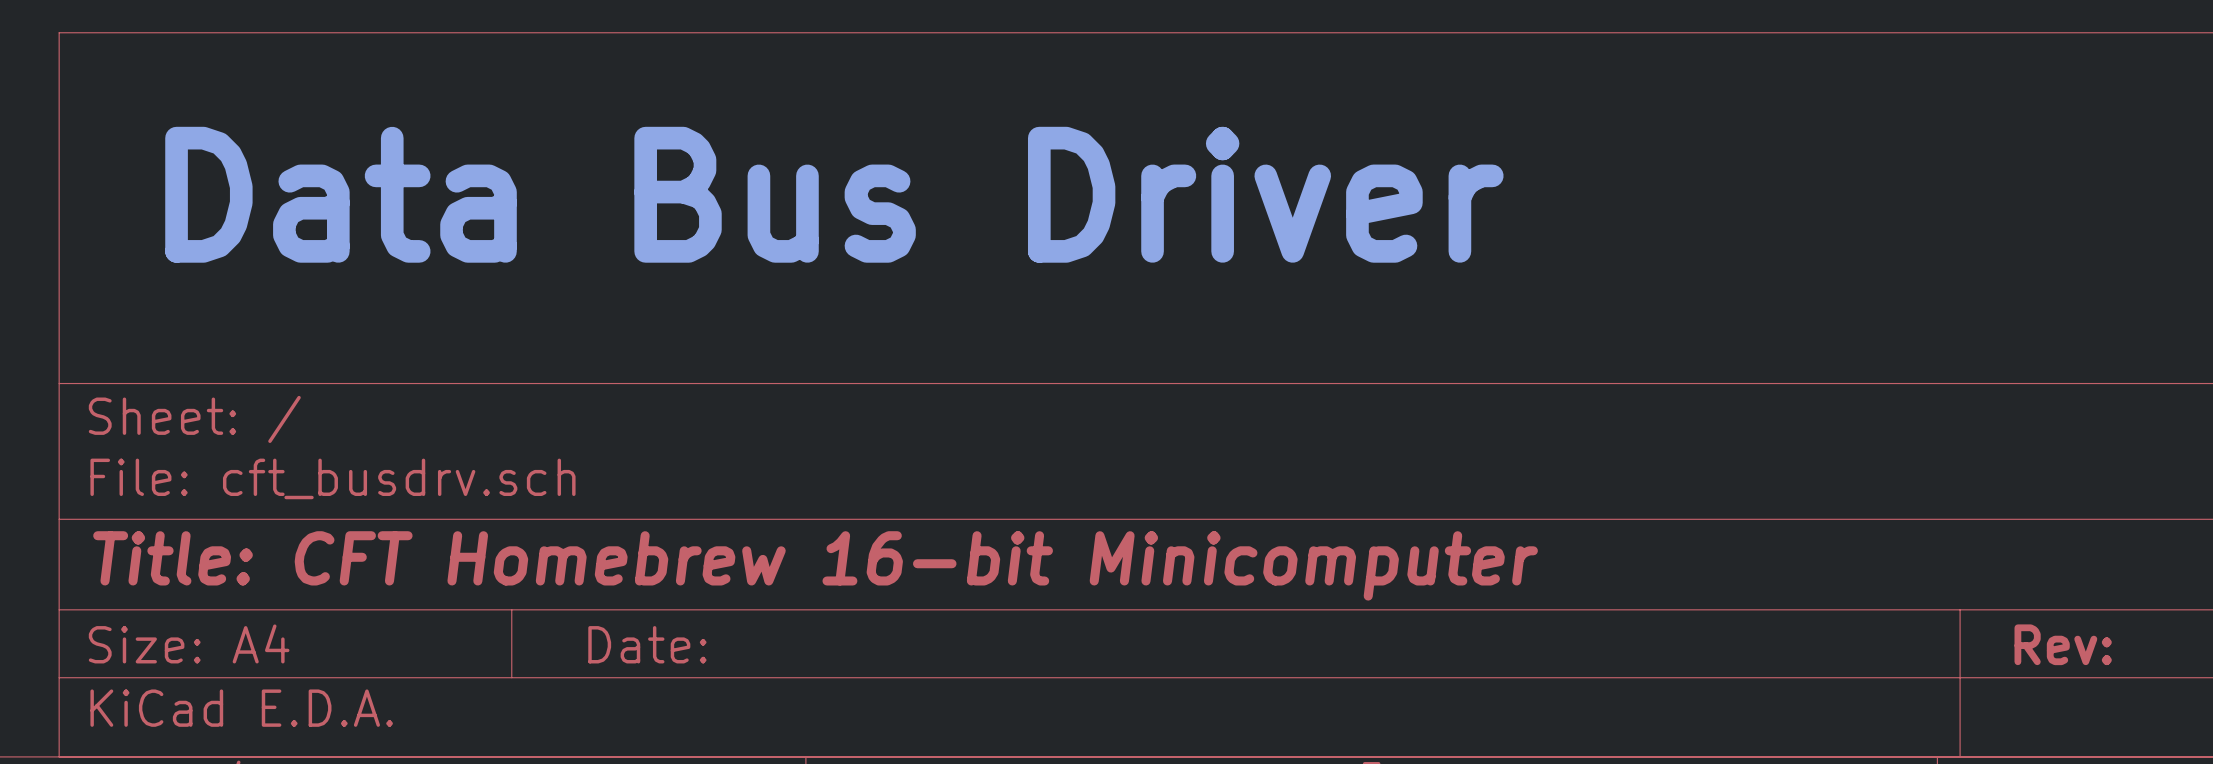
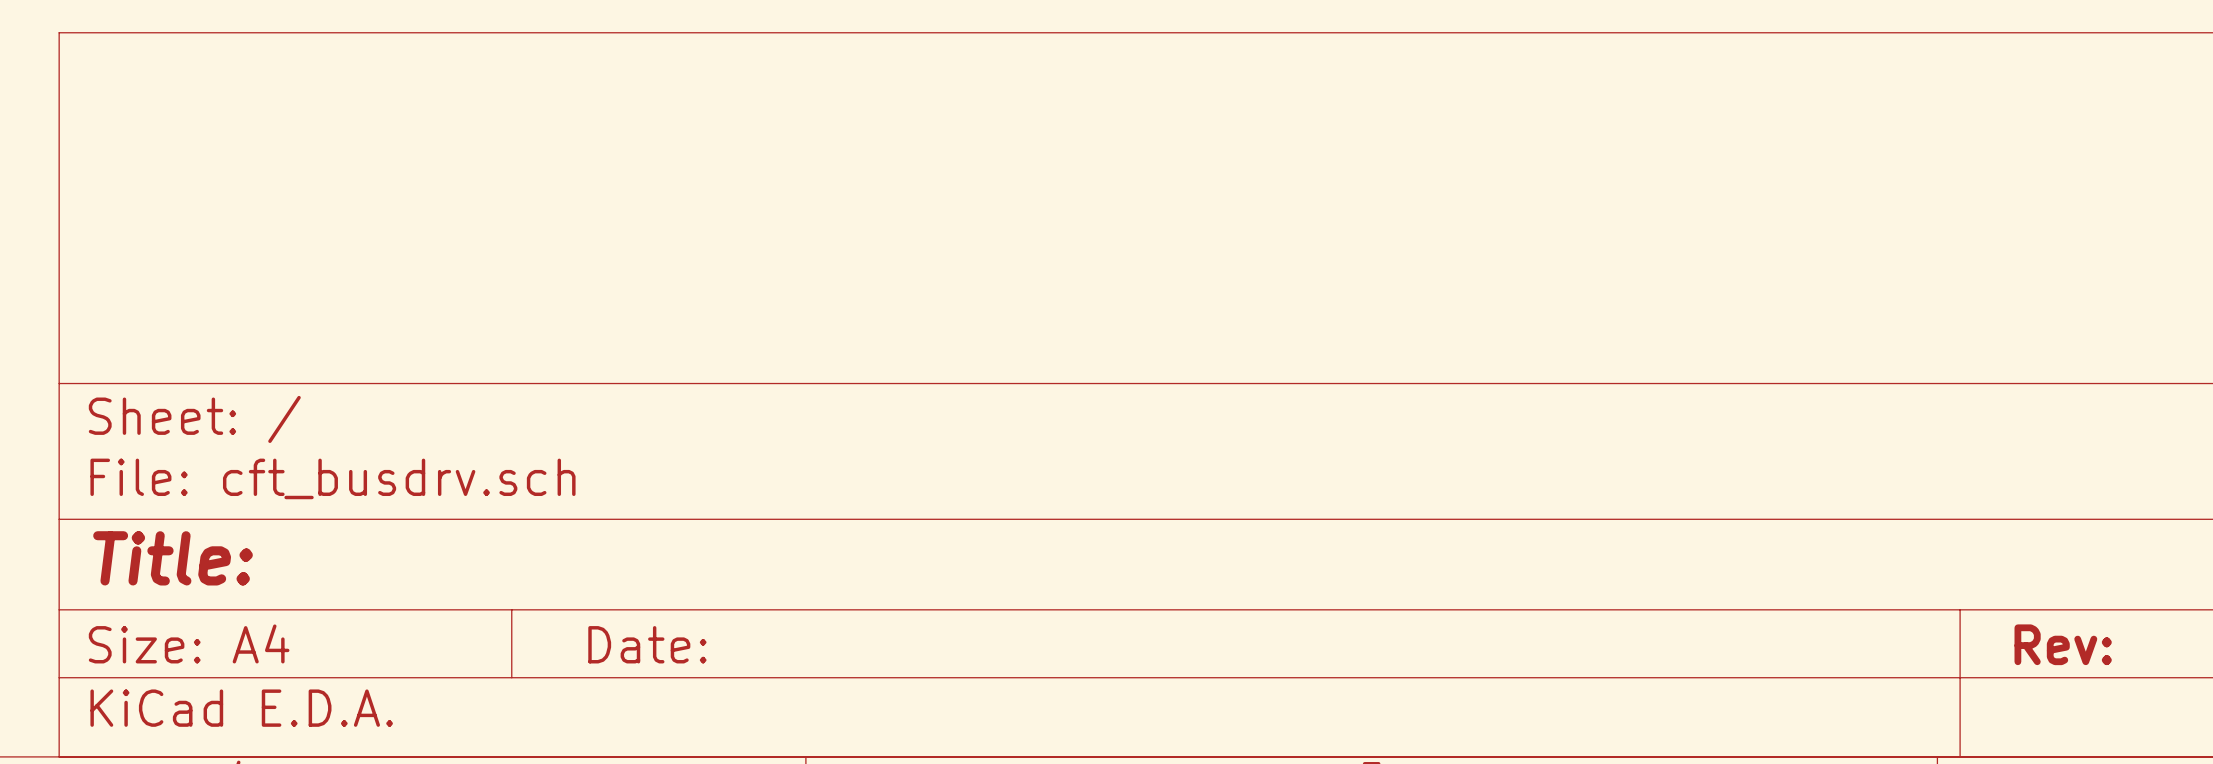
text: Data Bus Driver (834, 194) -> none
title block: Title: CFT Homebrew 16-bit Minicomputer (815, 565) -> Title: (173, 558)

